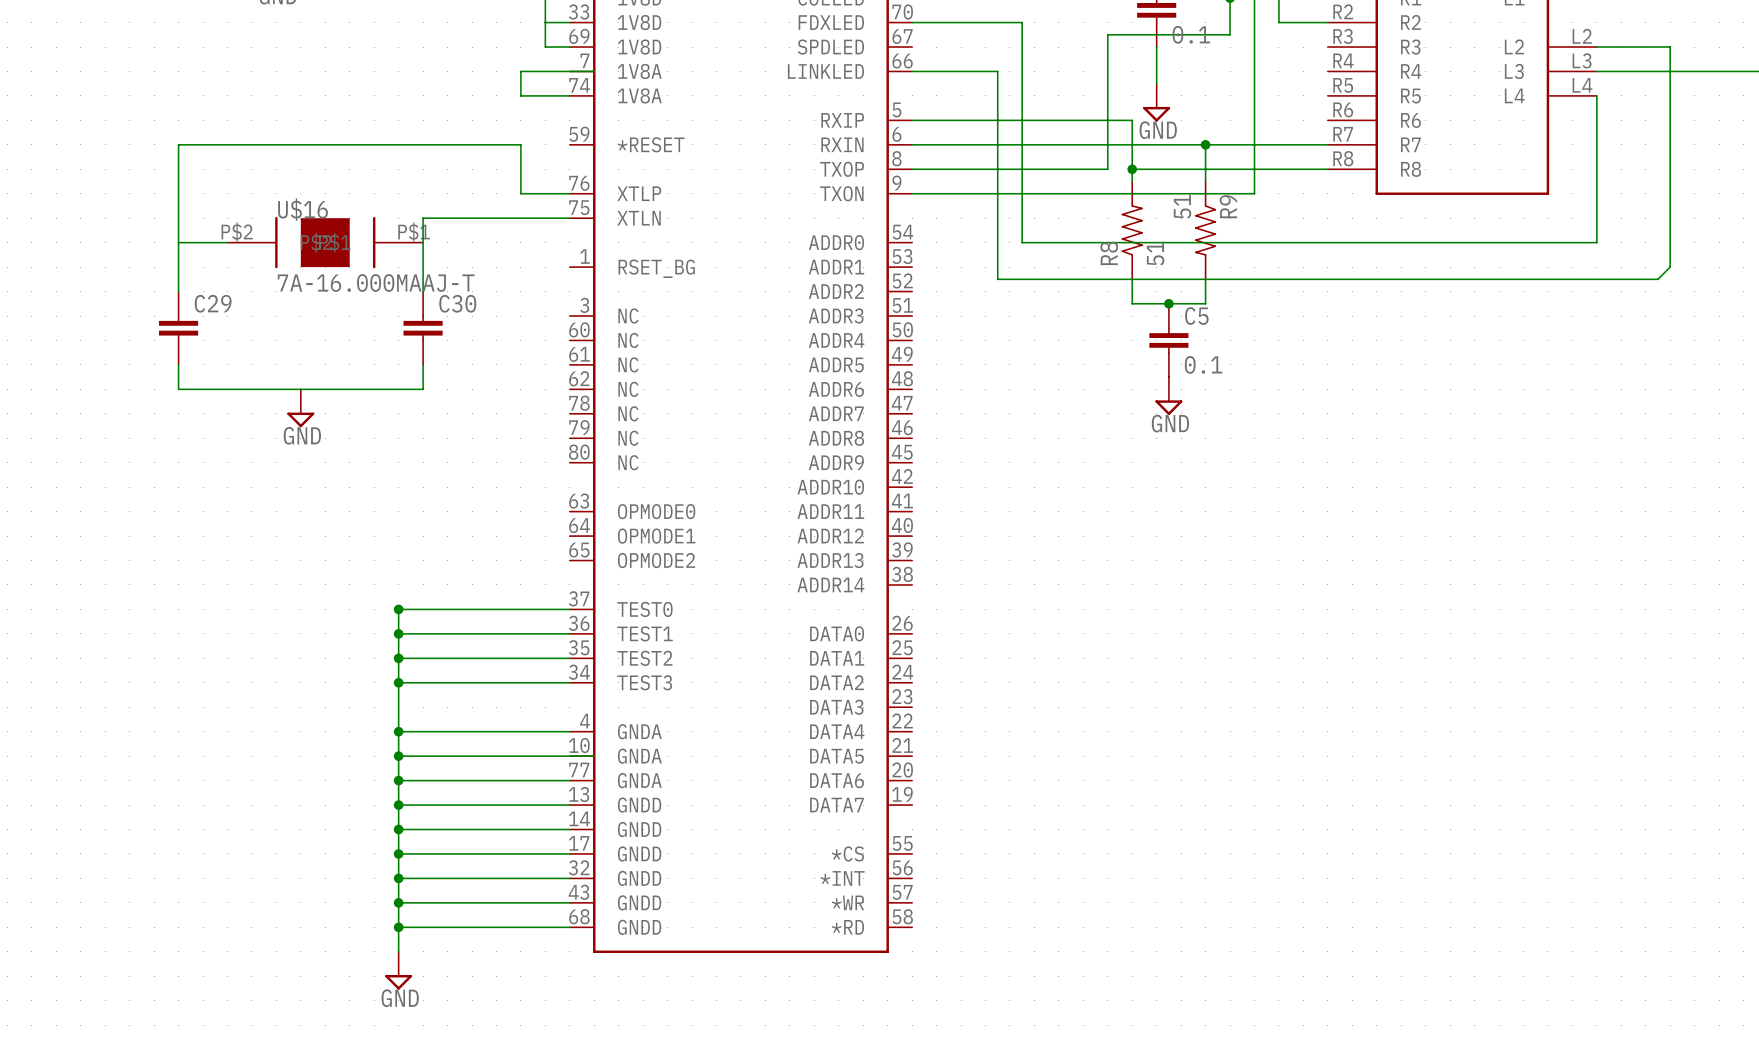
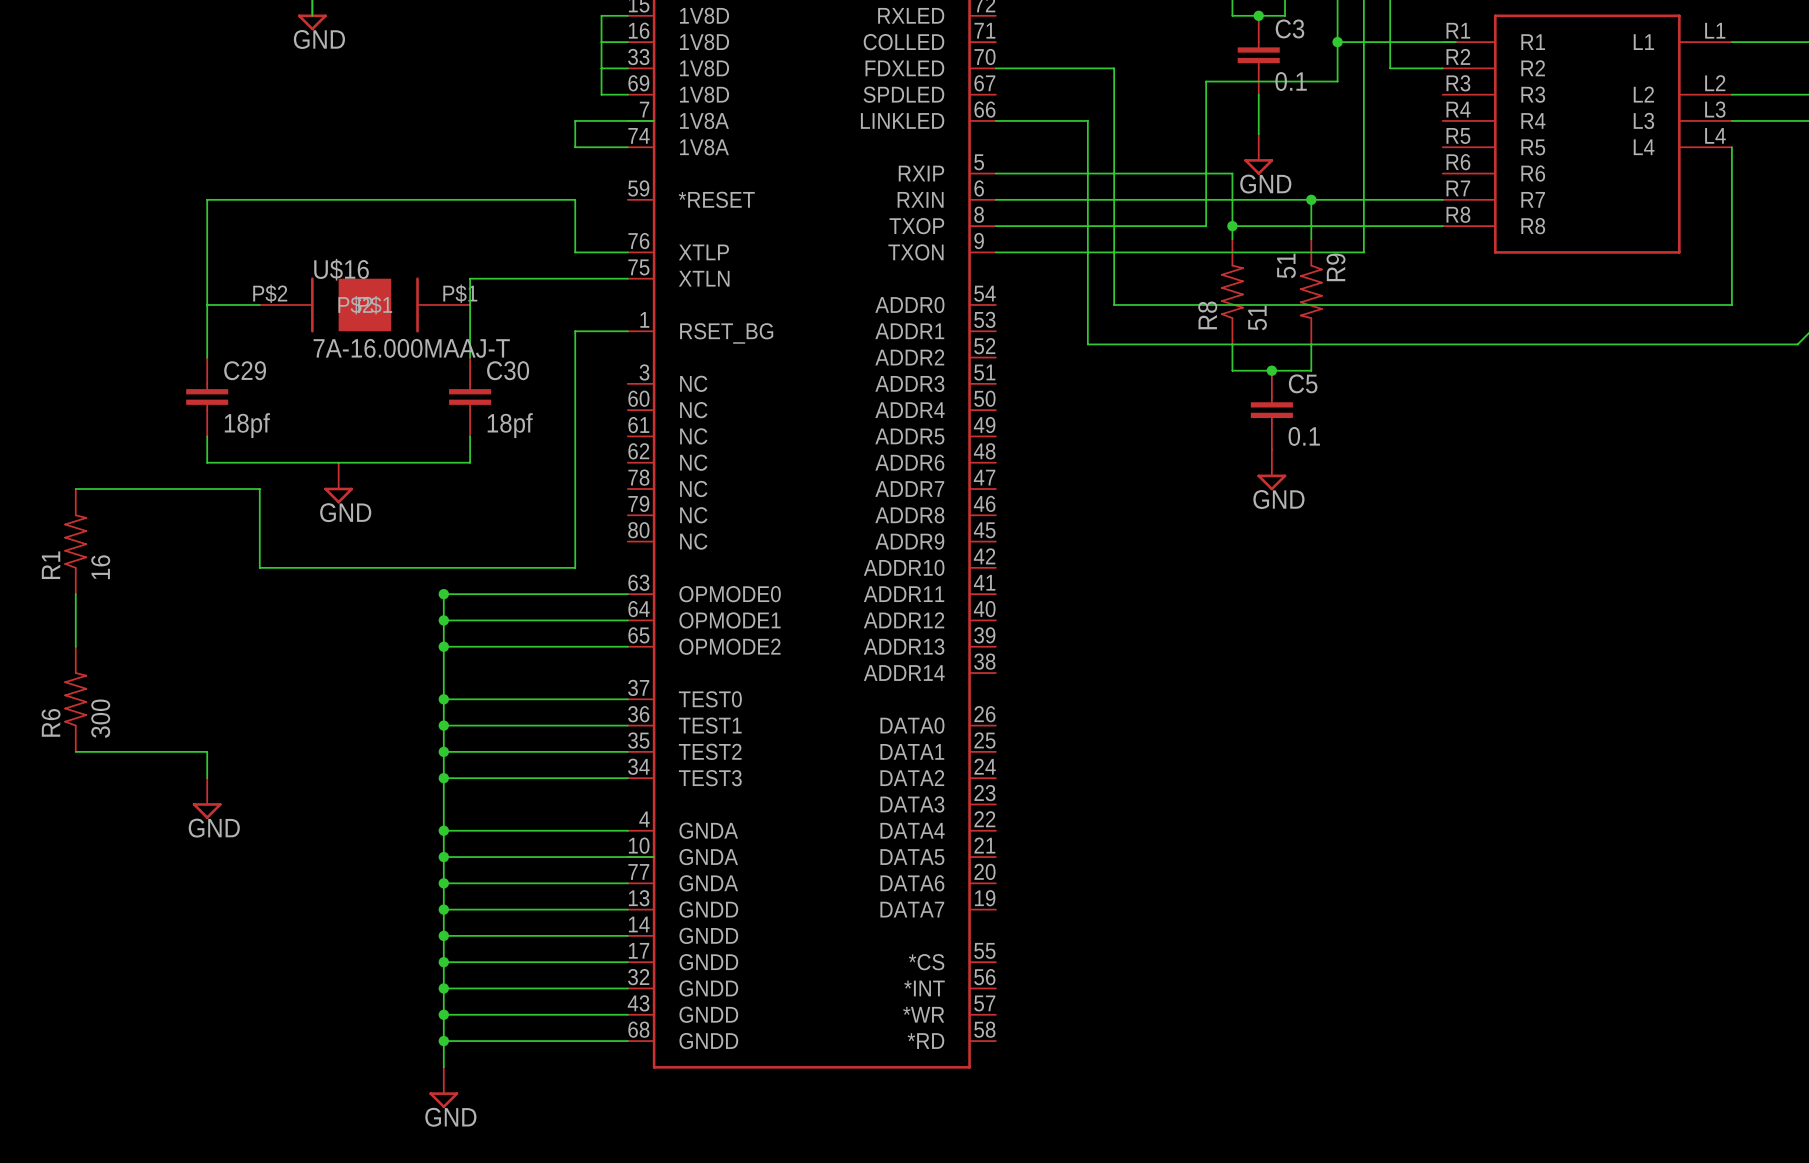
wire: none -> (627, 331) (575, 331) (575, 567) (259, 567) (259, 489) (75, 489)
C29 value: none -> 18pf (247, 425)
C30 value: none -> 18pf (510, 425)
R1: none -> 16 (75, 541)
wire: none -> (75, 594) (75, 646)
junction: none -> (443, 594)
wire: none -> (627, 594) (443, 594) (443, 699)
wire: none -> (443, 620) (627, 620)
junction: none -> (443, 620)
wire: none -> (443, 646) (627, 646)
junction: none -> (443, 646)
R6: none -> 300 (75, 699)
wire: none -> (75, 751) (207, 751) (207, 778)
power symbol: none -> GND (207, 798)

